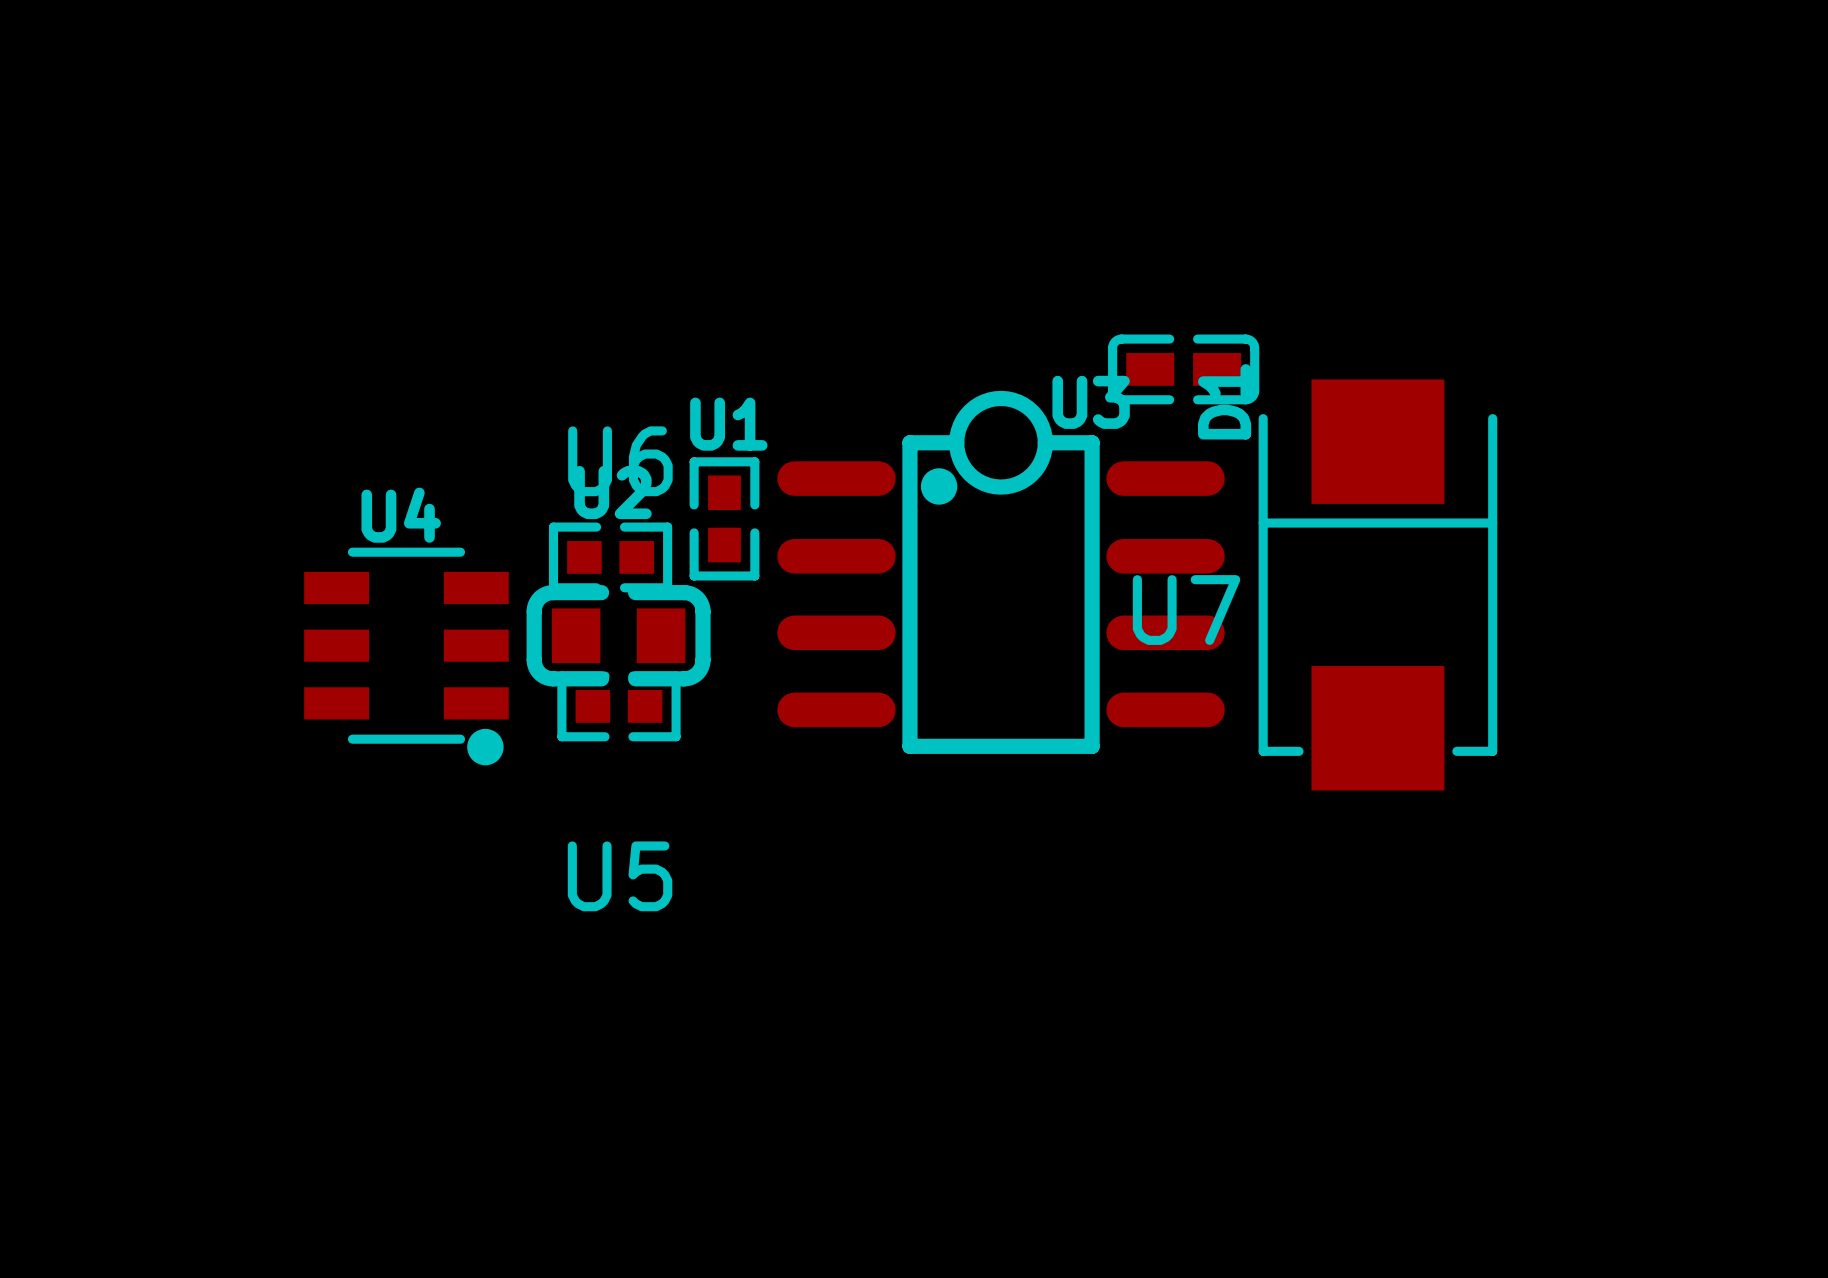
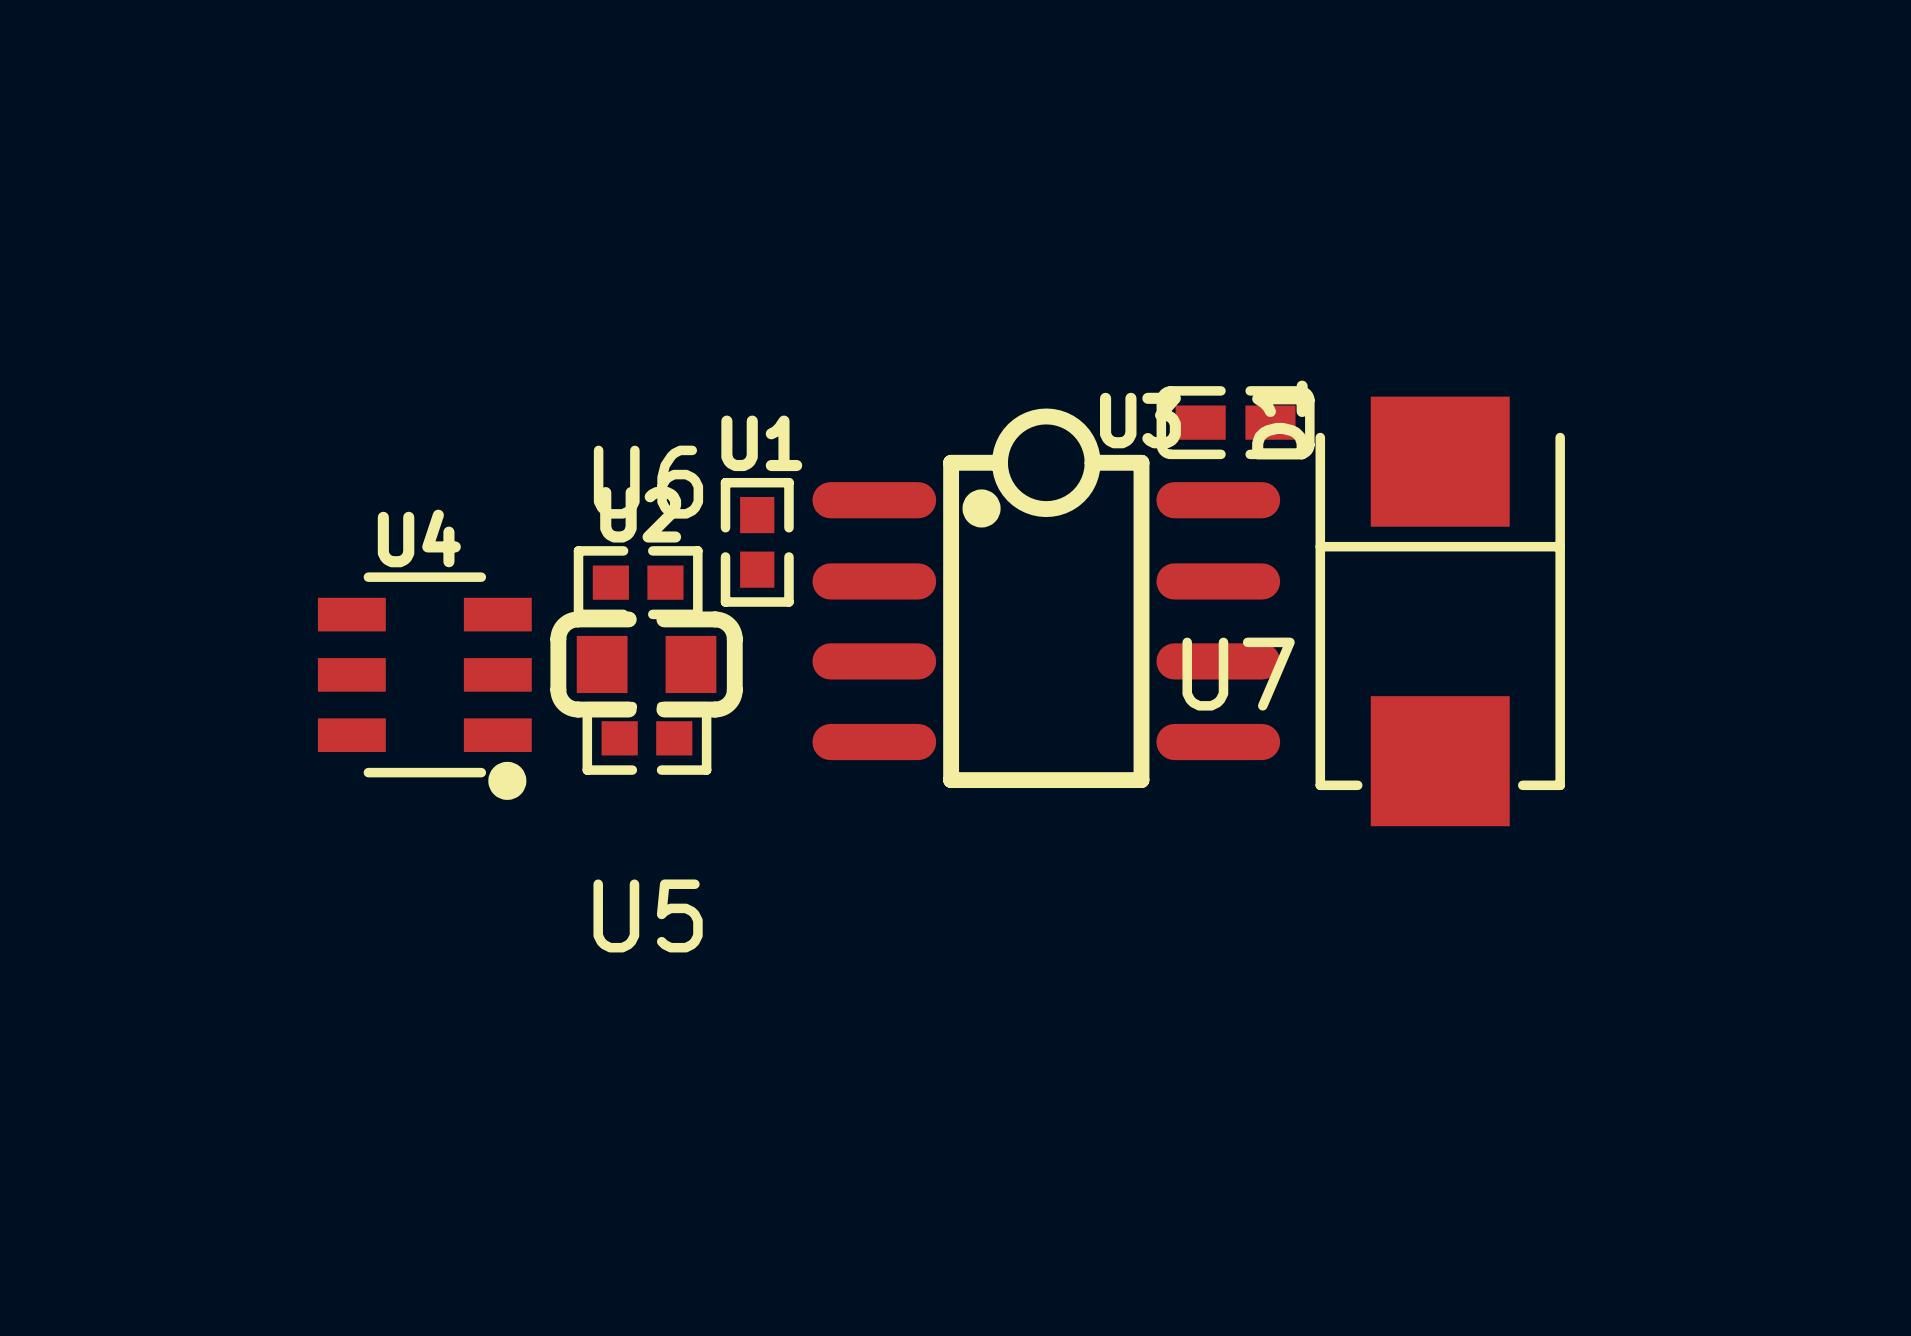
U7 position: (1183, 369) -> (1235, 422)

